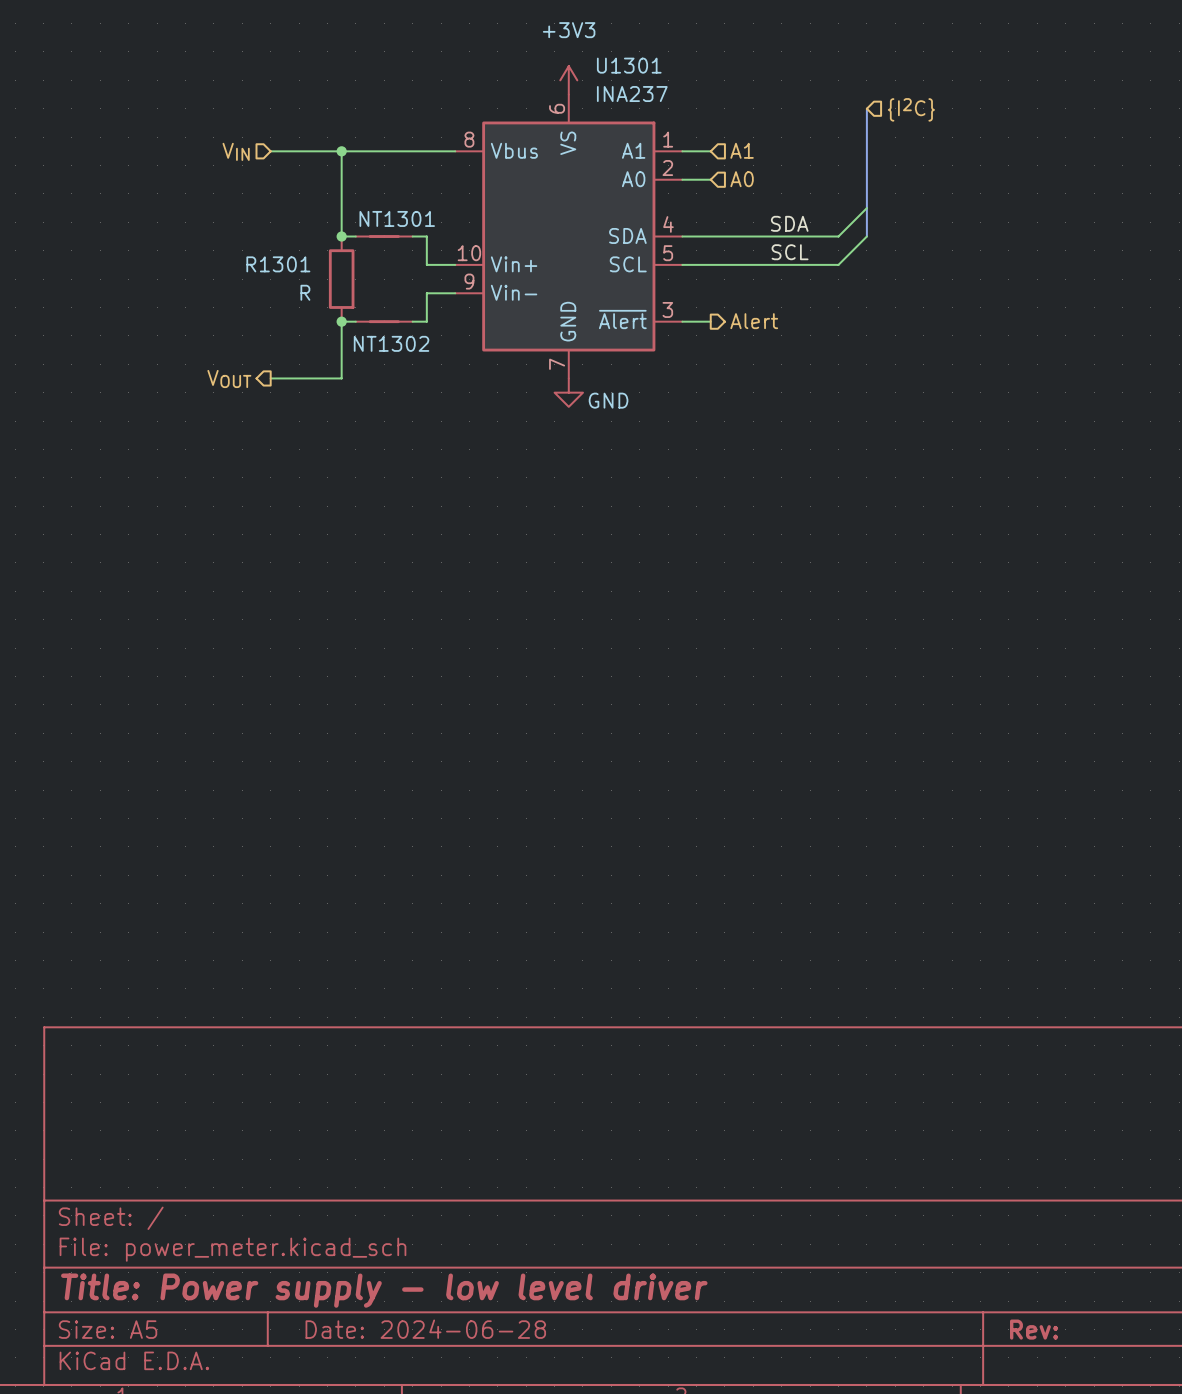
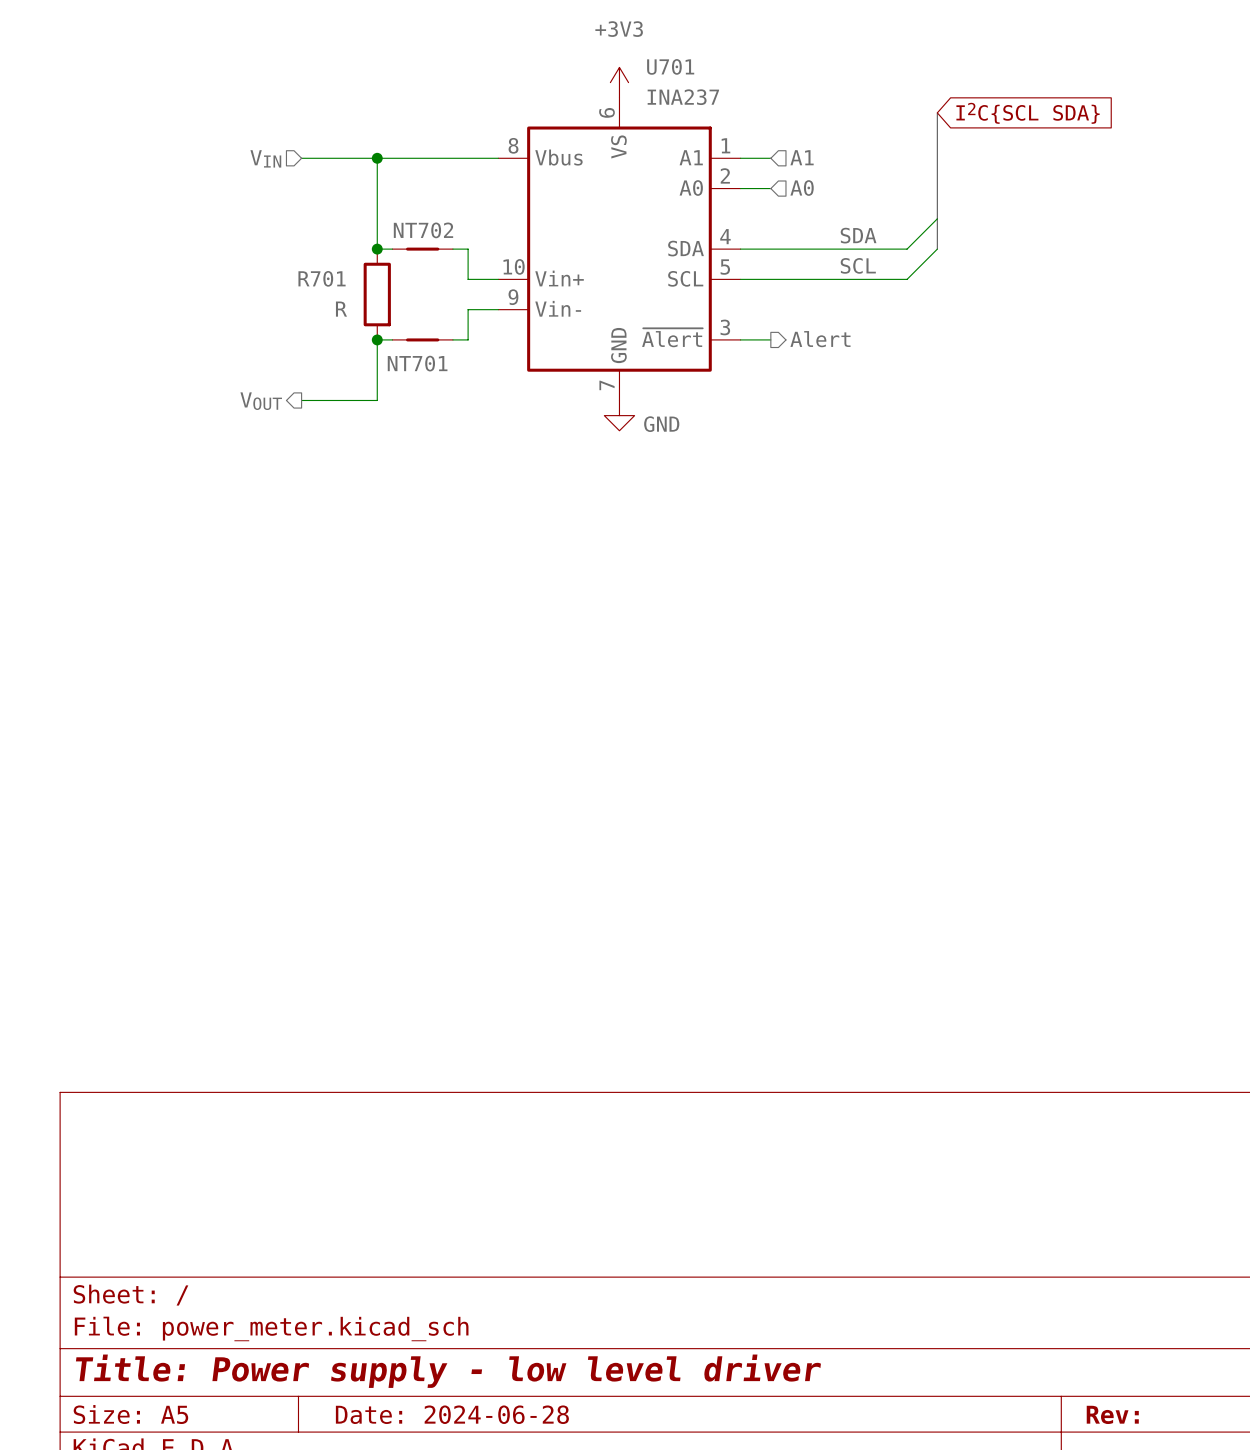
U1301 name: U1301 (629, 65) -> U701 (670, 66)
hierarchical label: {I2C} (911, 109) -> none
global label: none -> I2C{SCL SDA} (1028, 113)
NT1301 name: NT1301 (397, 218) -> NT702 (423, 230)
R1301 name: R1301 (278, 264) -> R701 (322, 278)
NT1302 name: NT1302 (391, 343) -> NT701 (417, 363)

